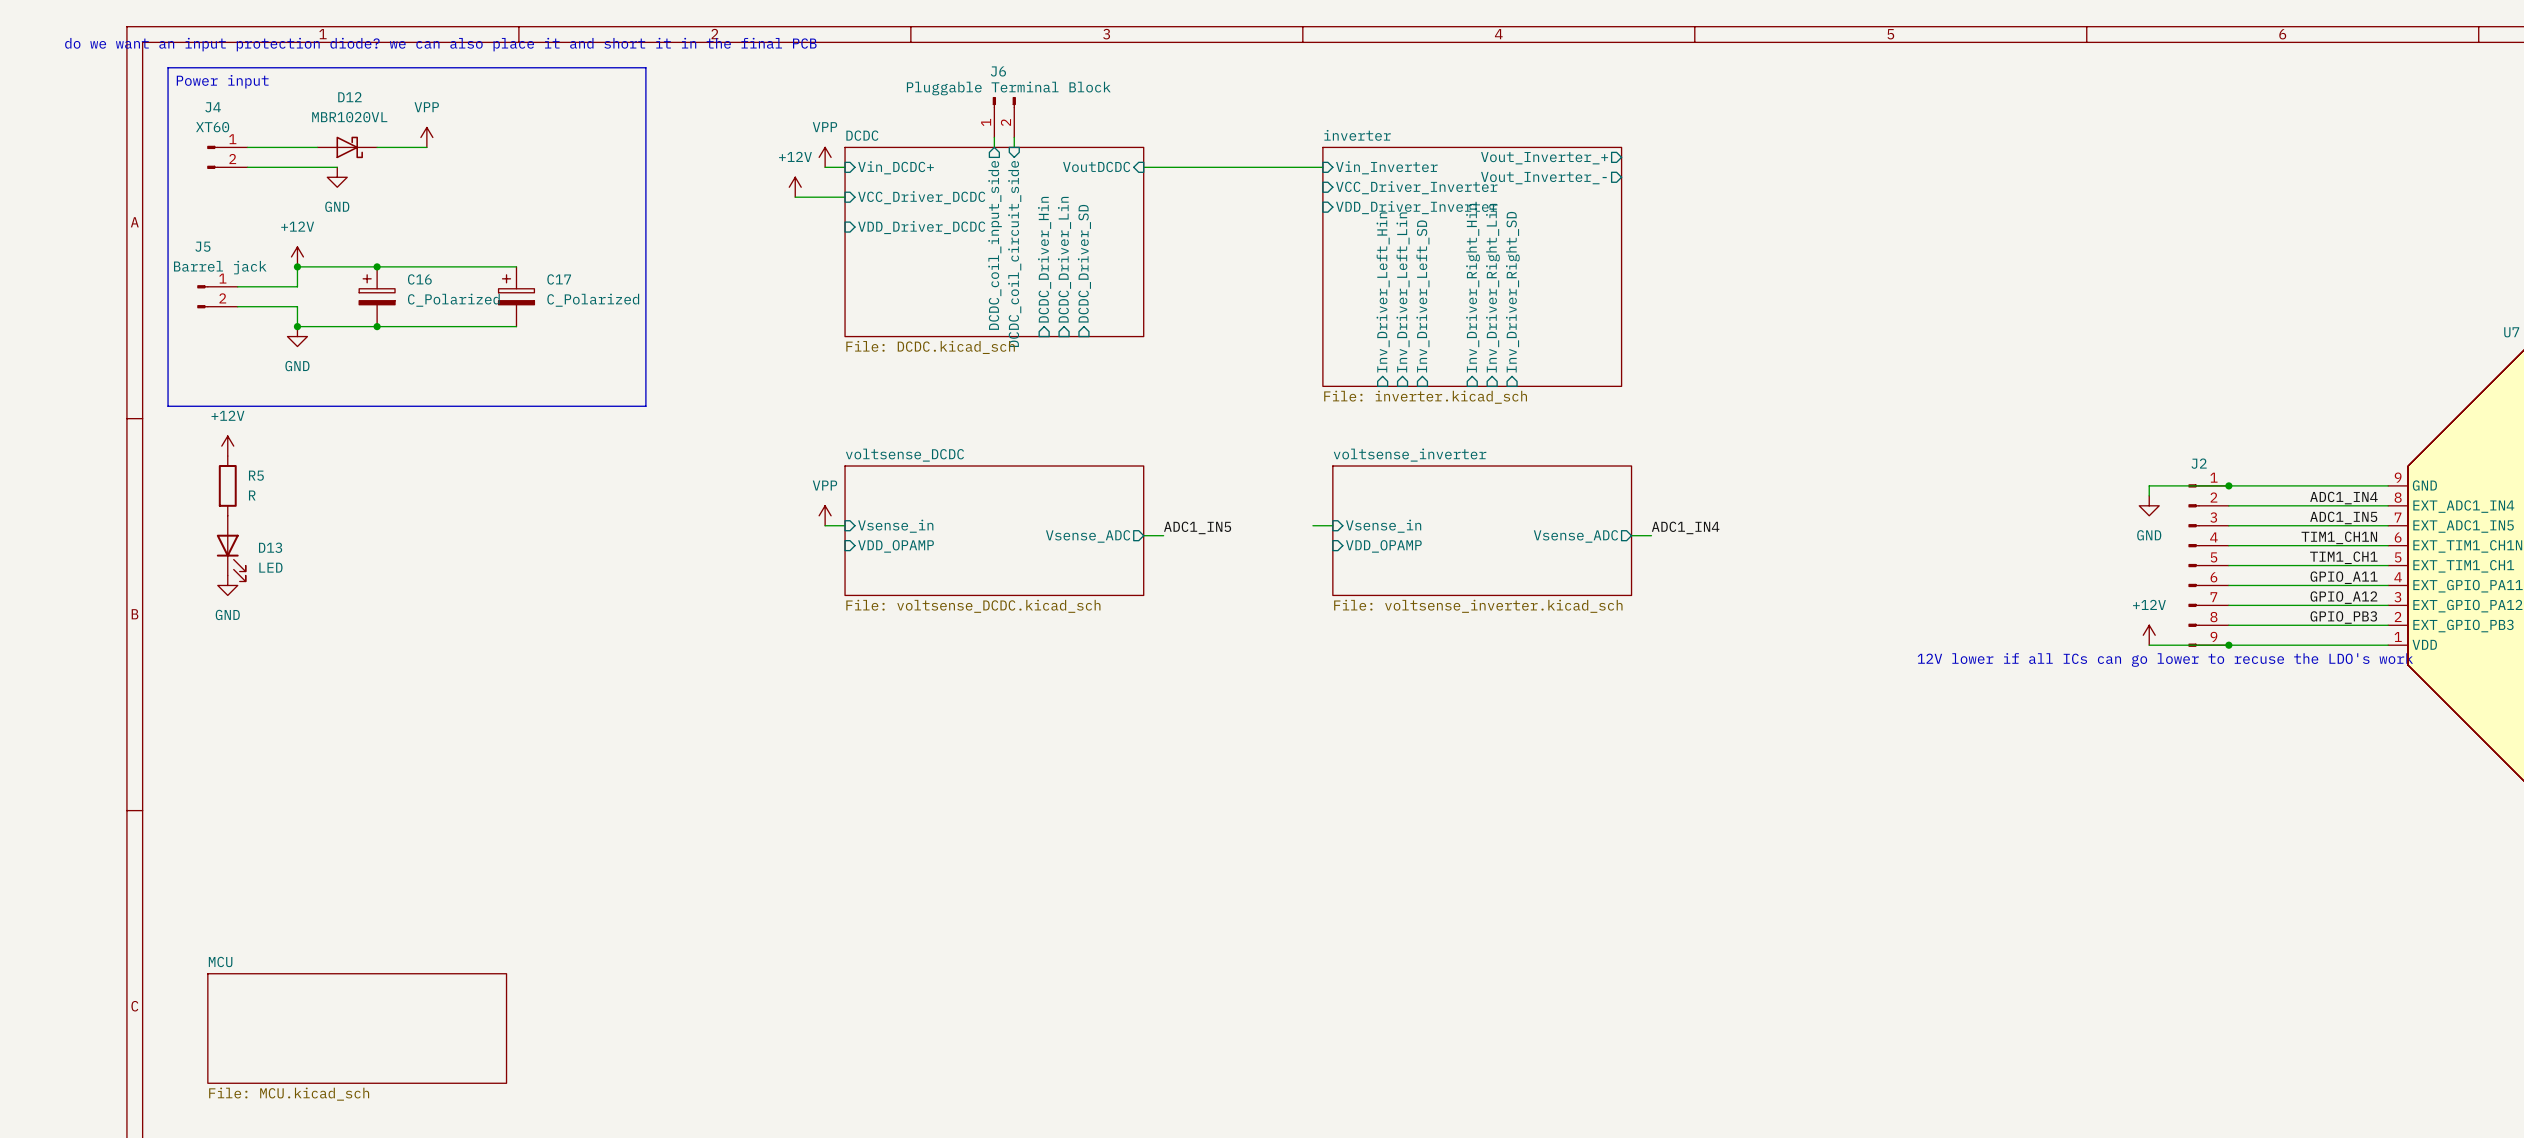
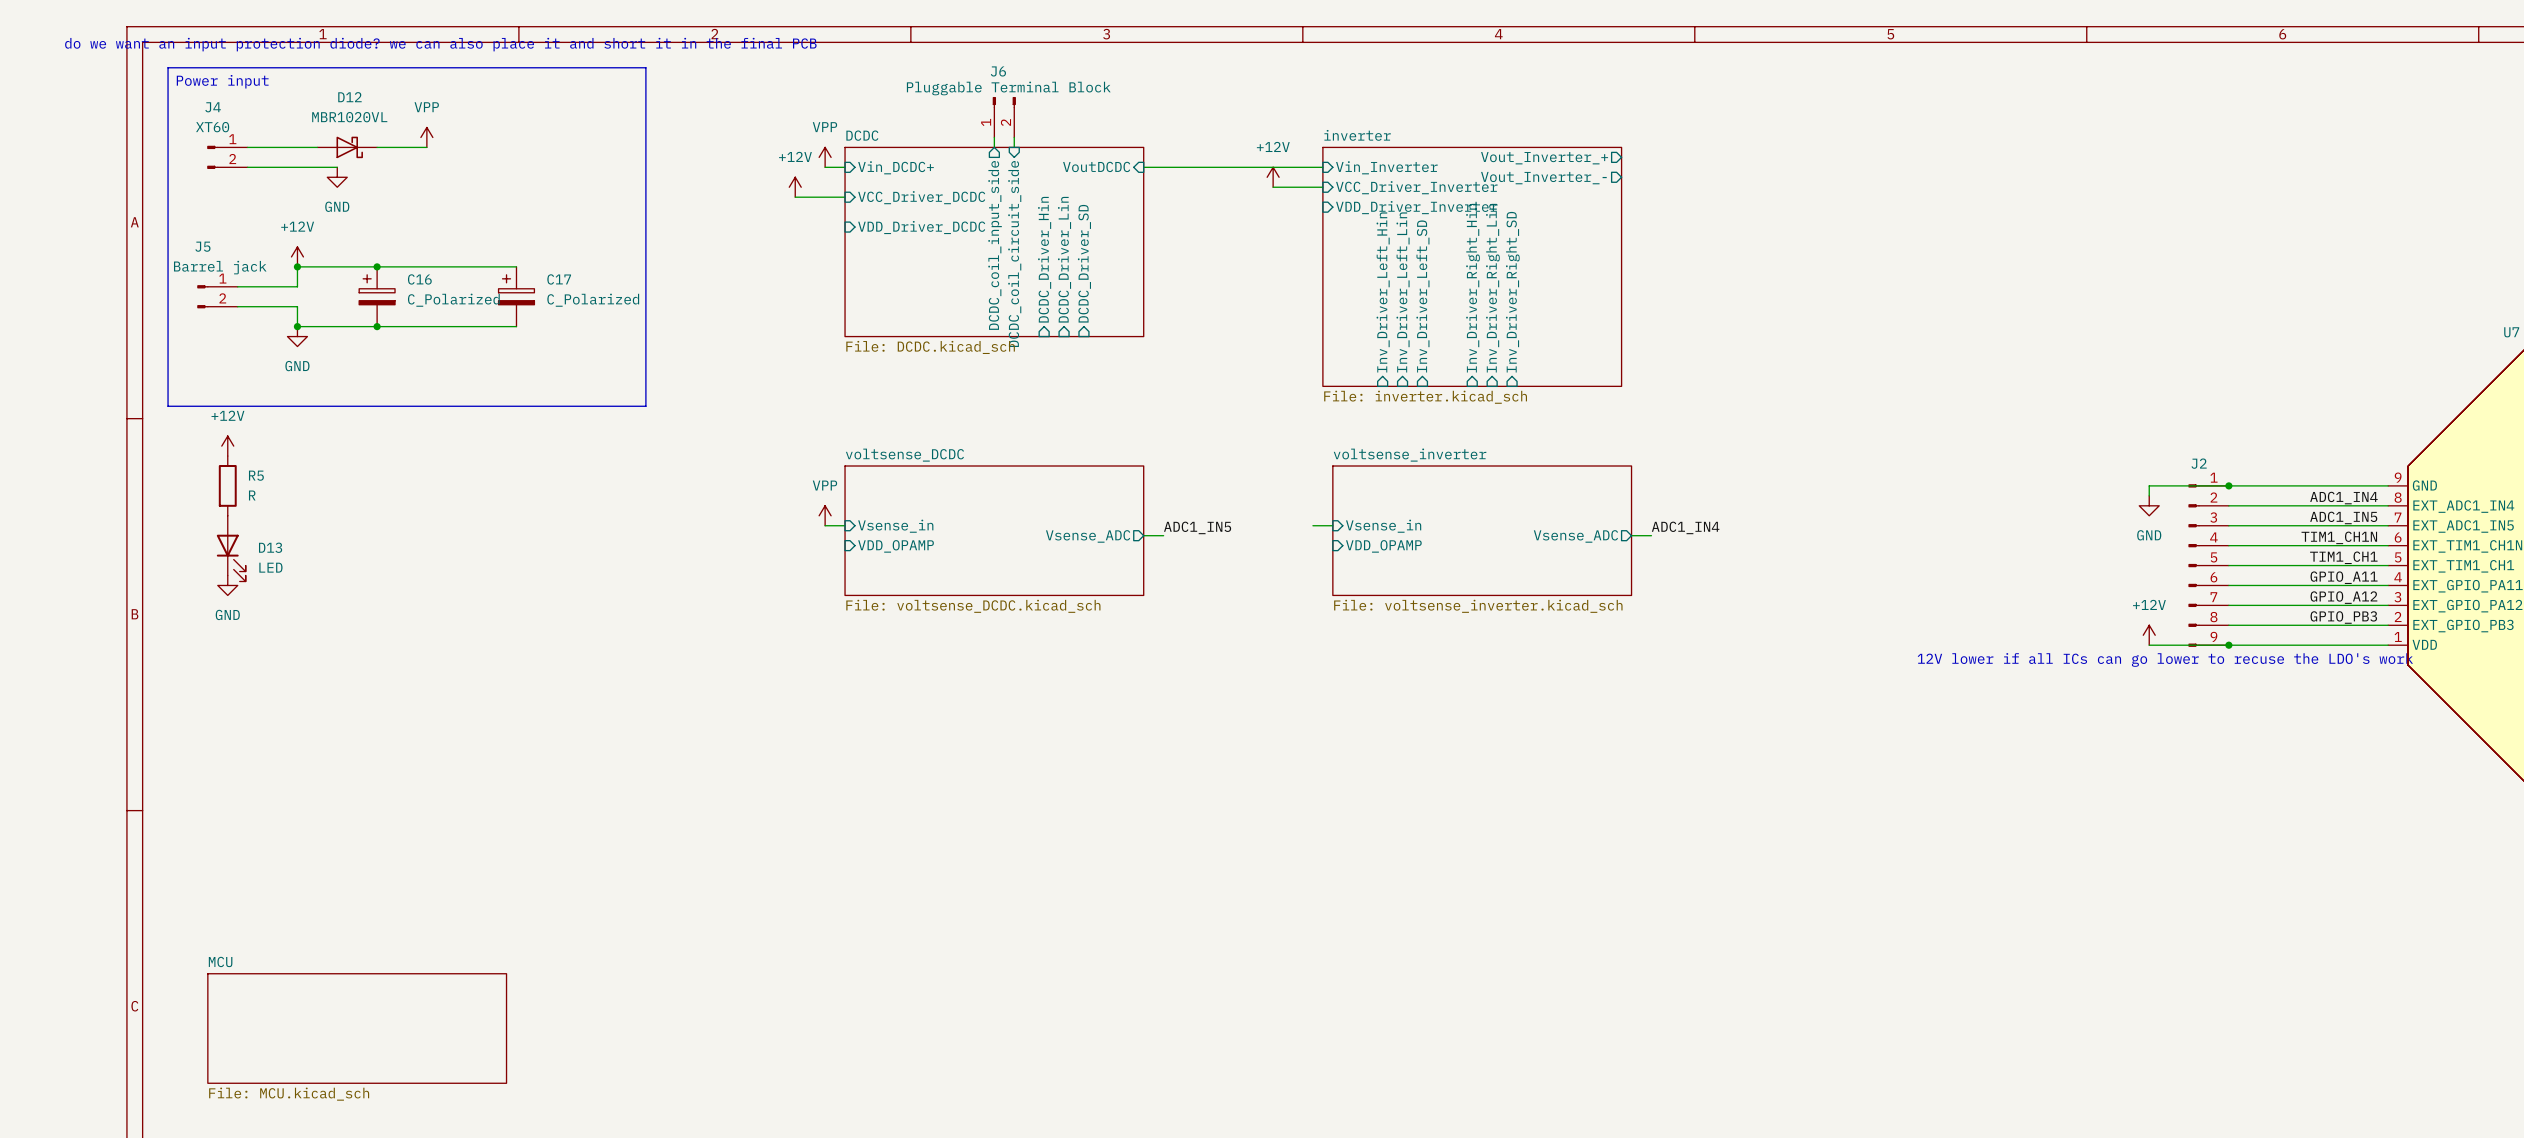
power symbol: none -> +12V (1273, 177)
wire: none -> (1273, 187) (1322, 187)

